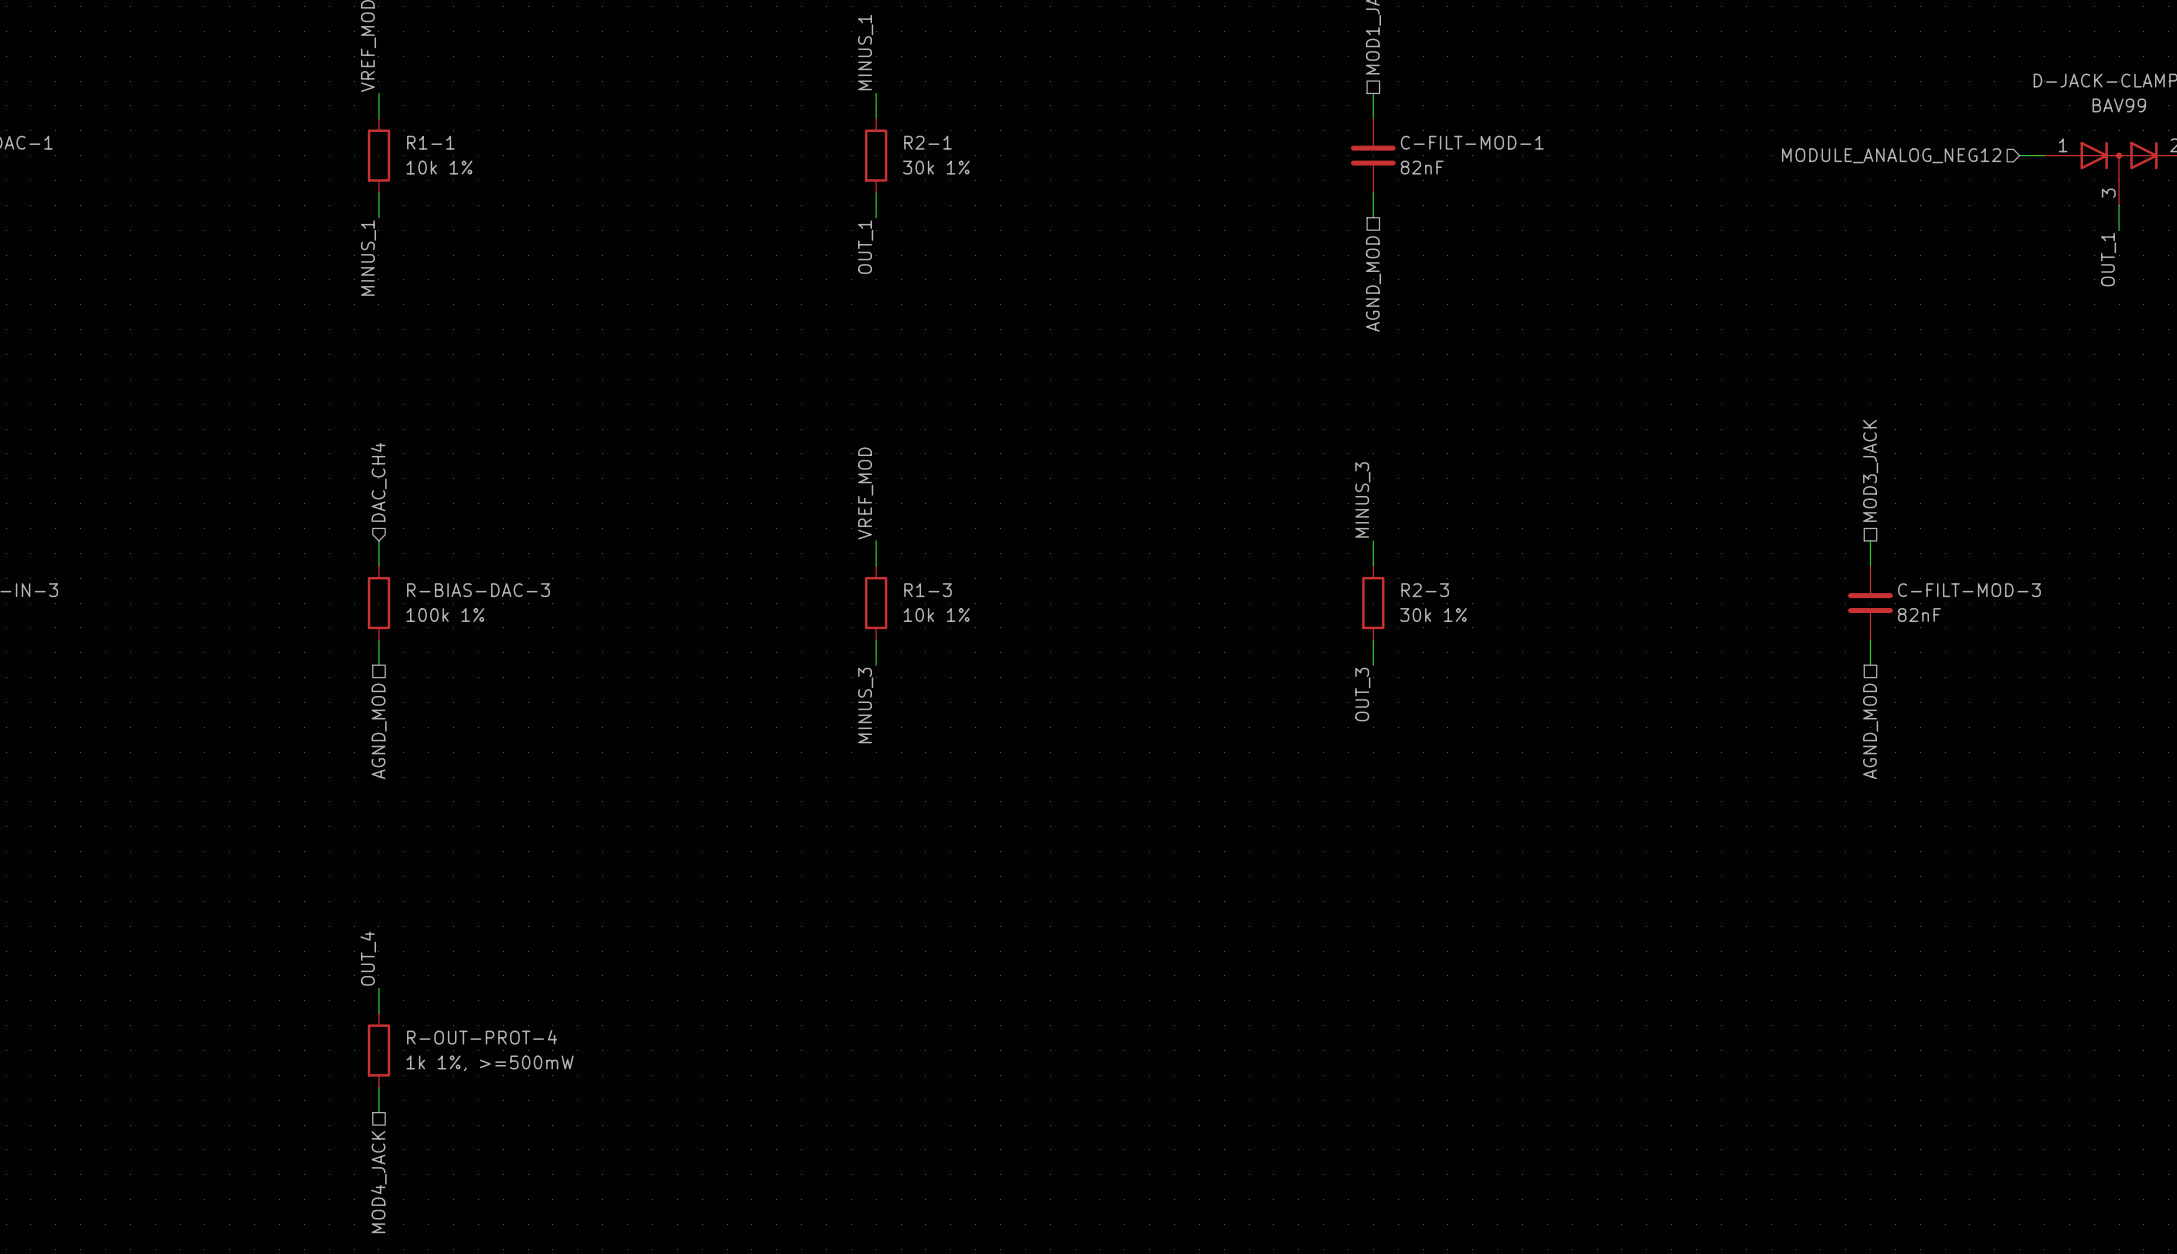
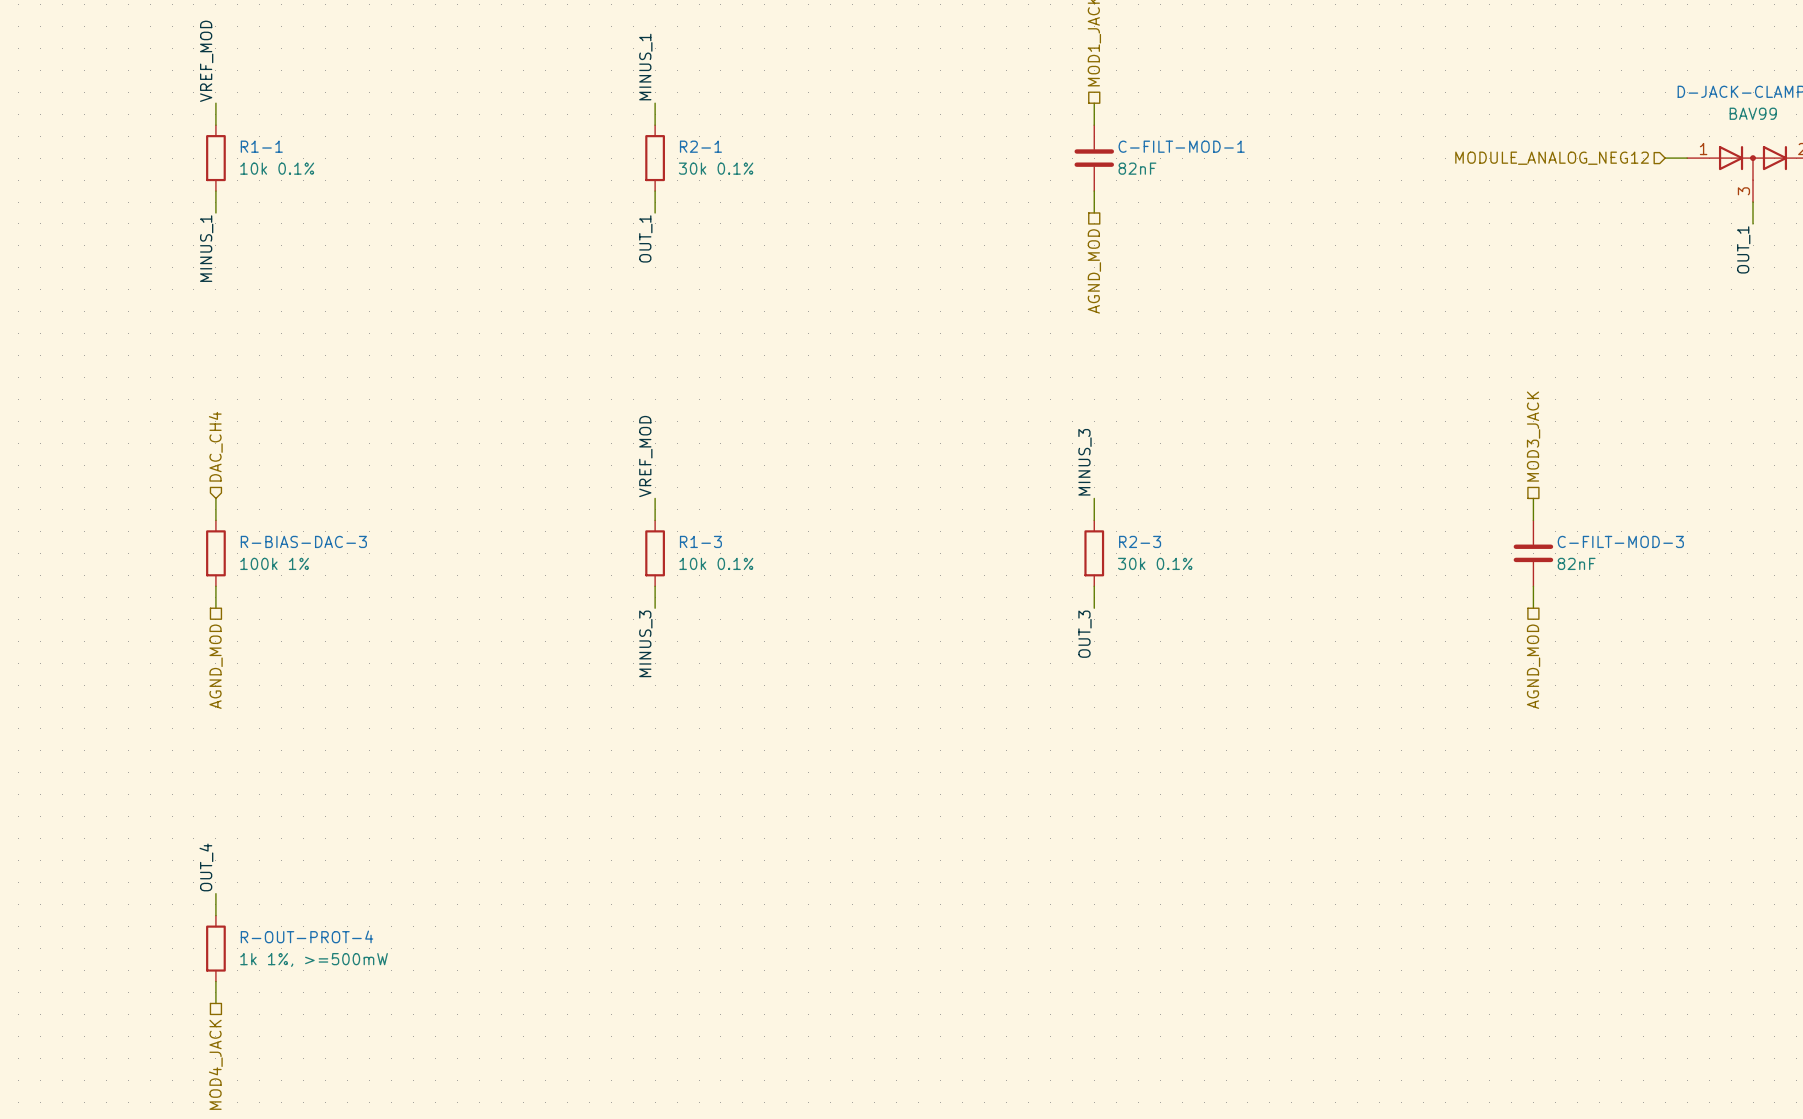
R1-1 value: 10k 1% (439, 167) -> 10k 0.1% (277, 168)
R2-1 value: 30k 1% (936, 167) -> 30k 0.1% (716, 168)
R1-3 value: 10k 1% (936, 615) -> 10k 0.1% (716, 563)
R2-3 value: 30k 1% (1433, 615) -> 30k 0.1% (1155, 563)

